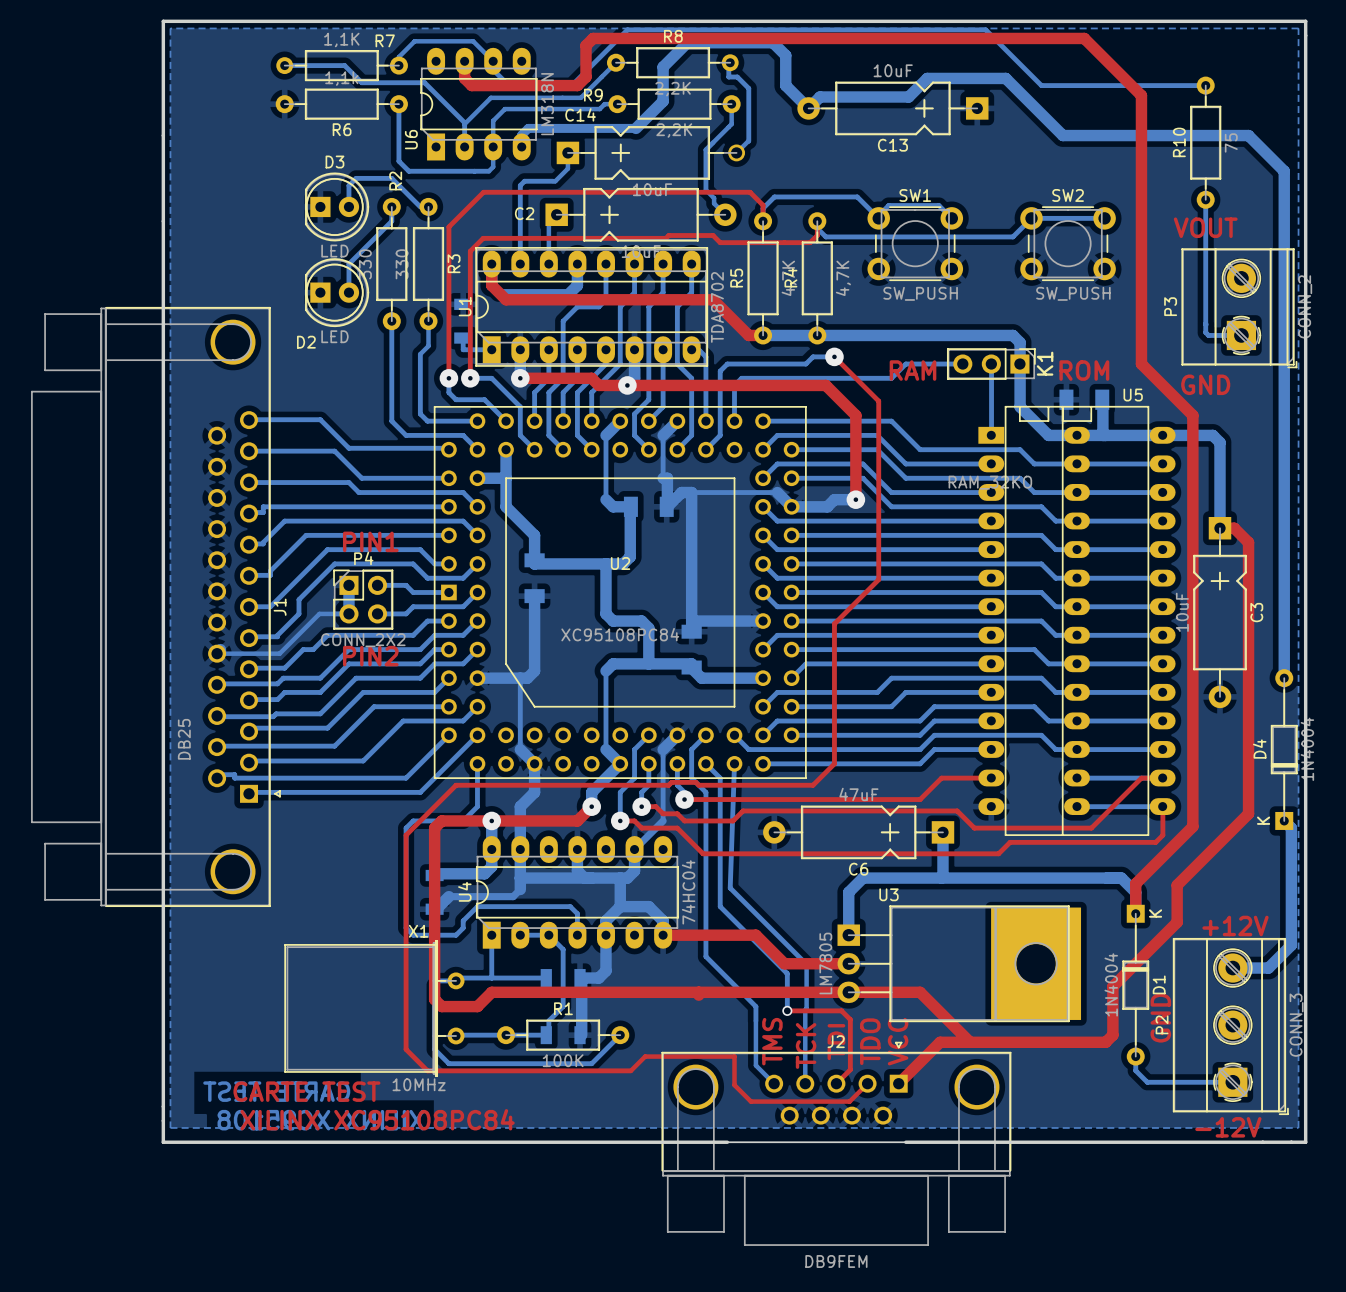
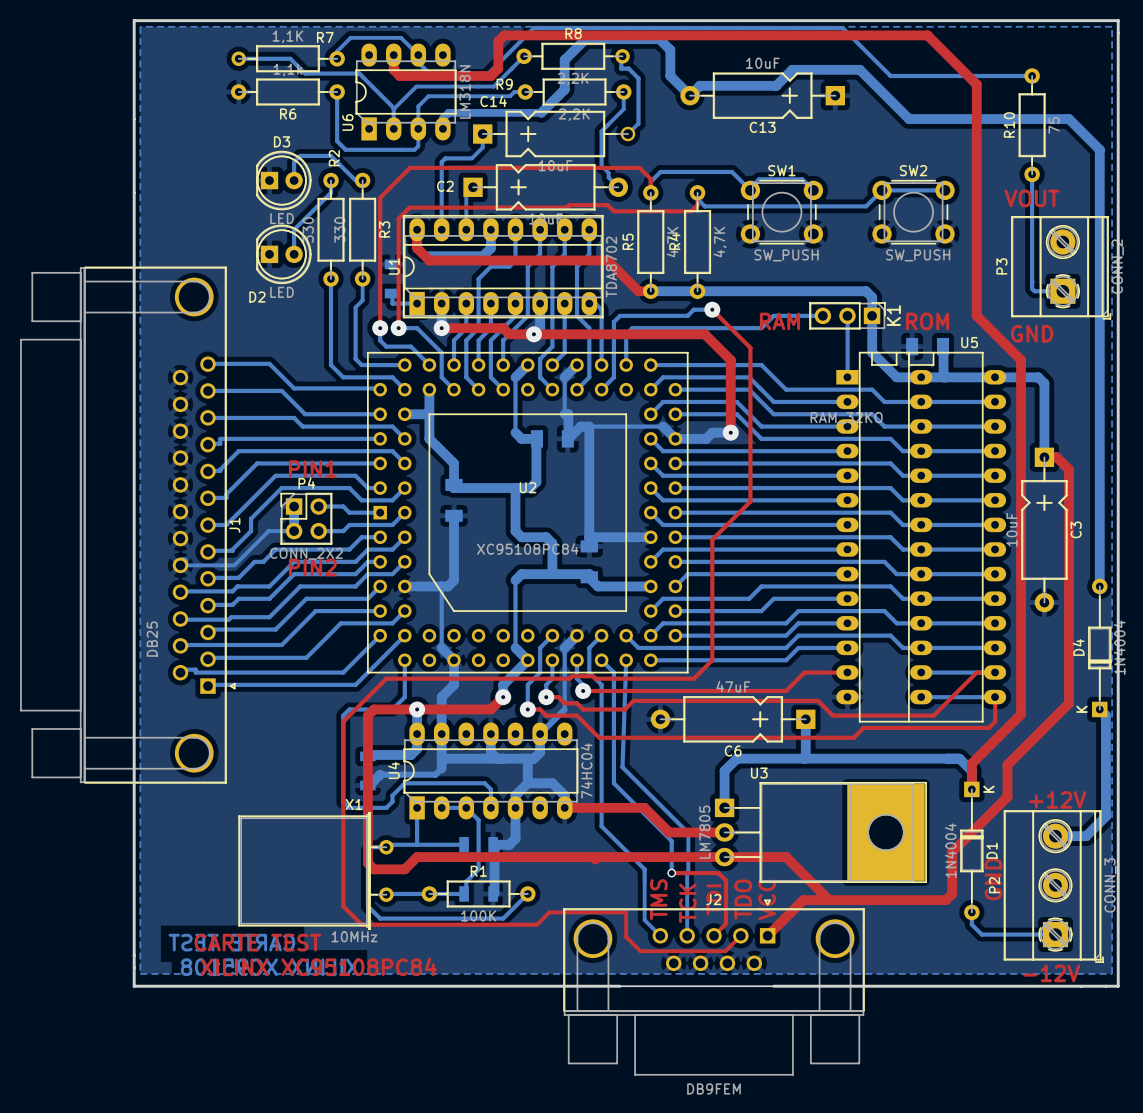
U3 footprint: [837, 905, 1082, 1022] -> [714, 782, 927, 883]

